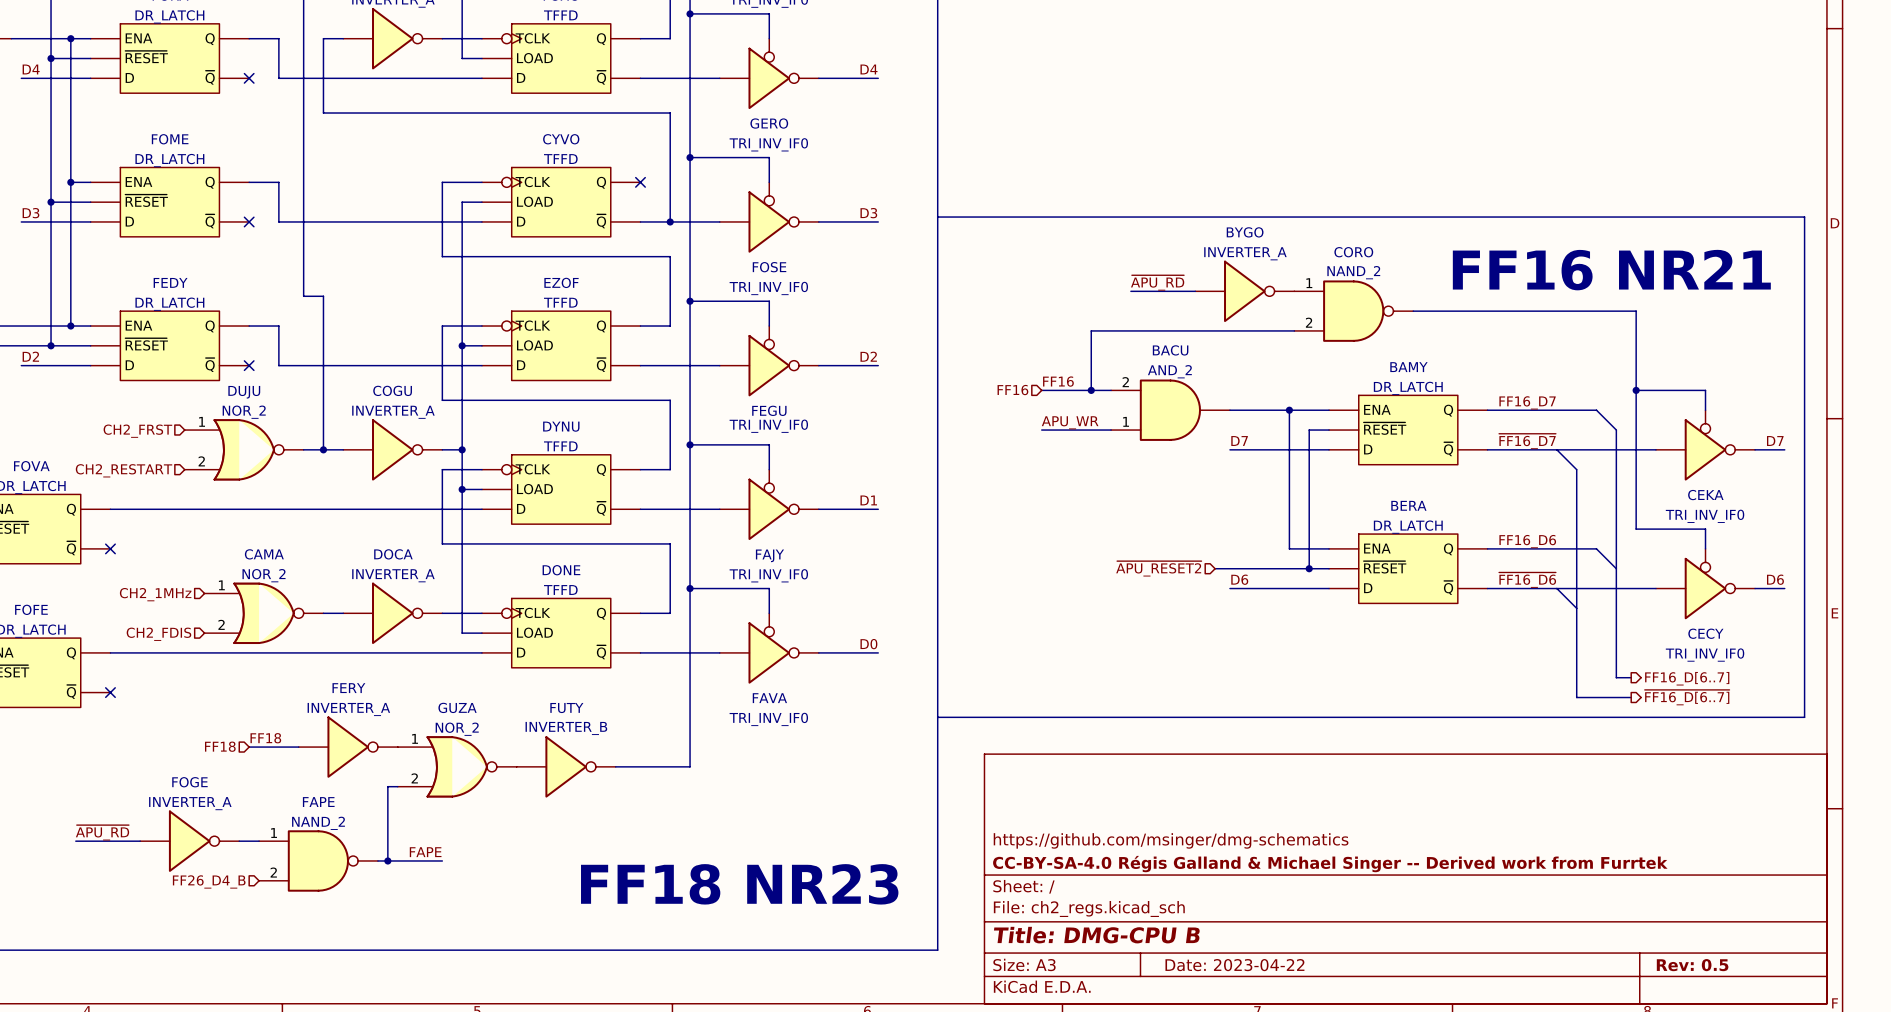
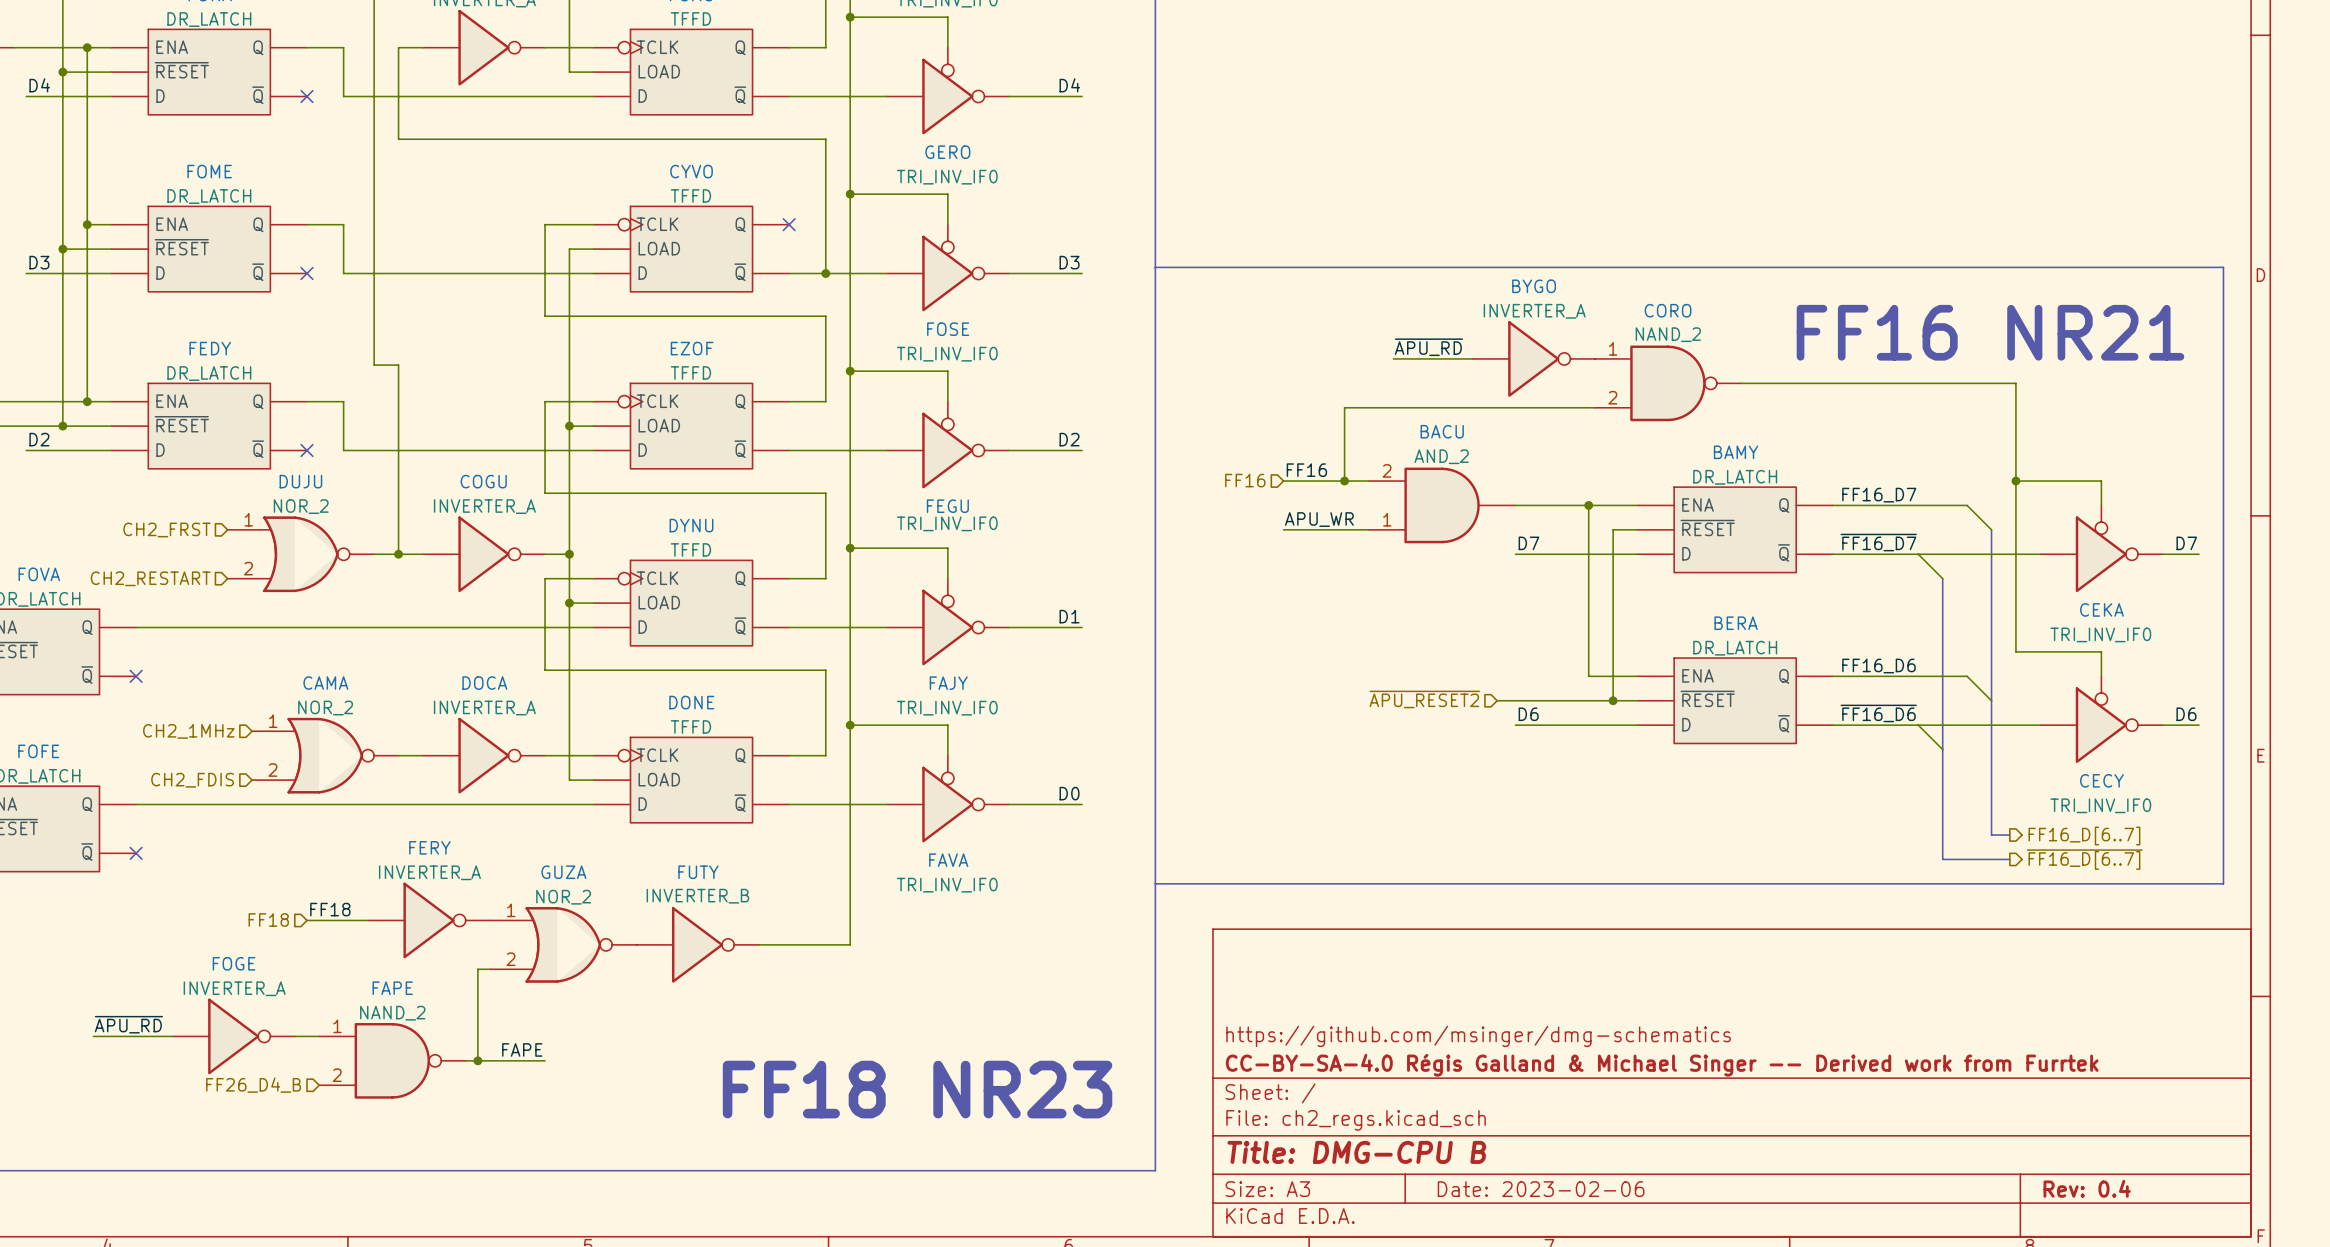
title block: Date: 2023-04-22 (1234, 965) -> Date: 2023-02-06 (1541, 1189)
title block: Rev: 0.5 (1692, 965) -> Rev: 0.4 (2087, 1188)

